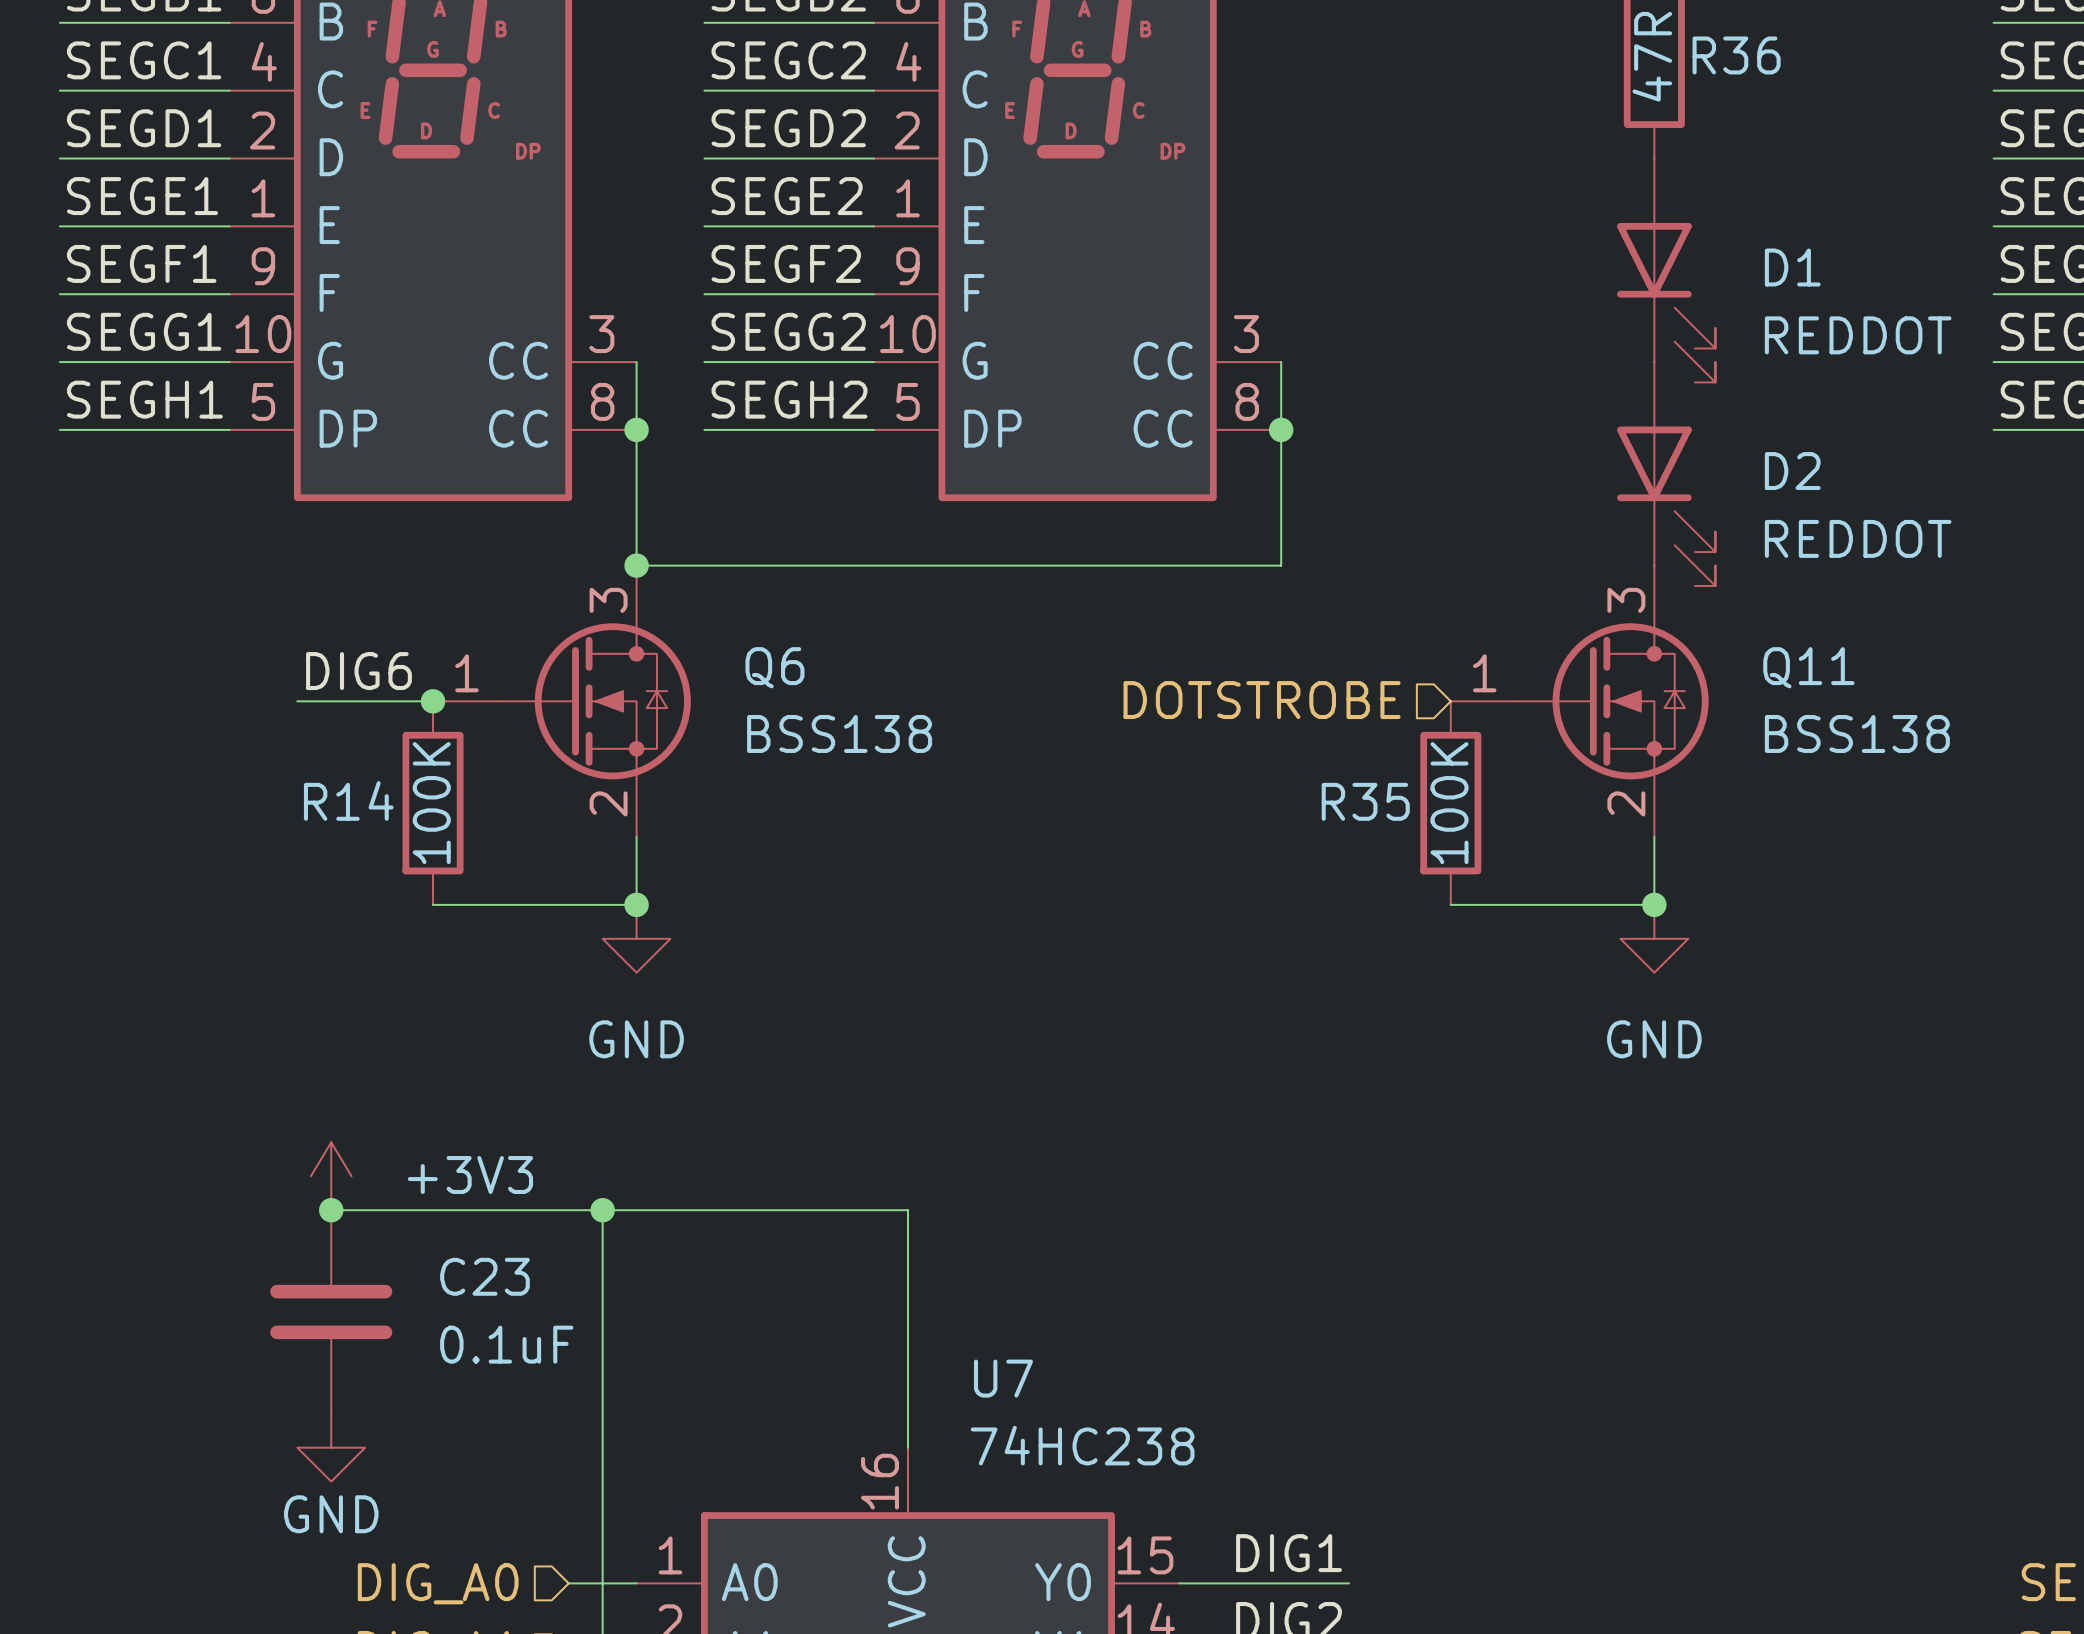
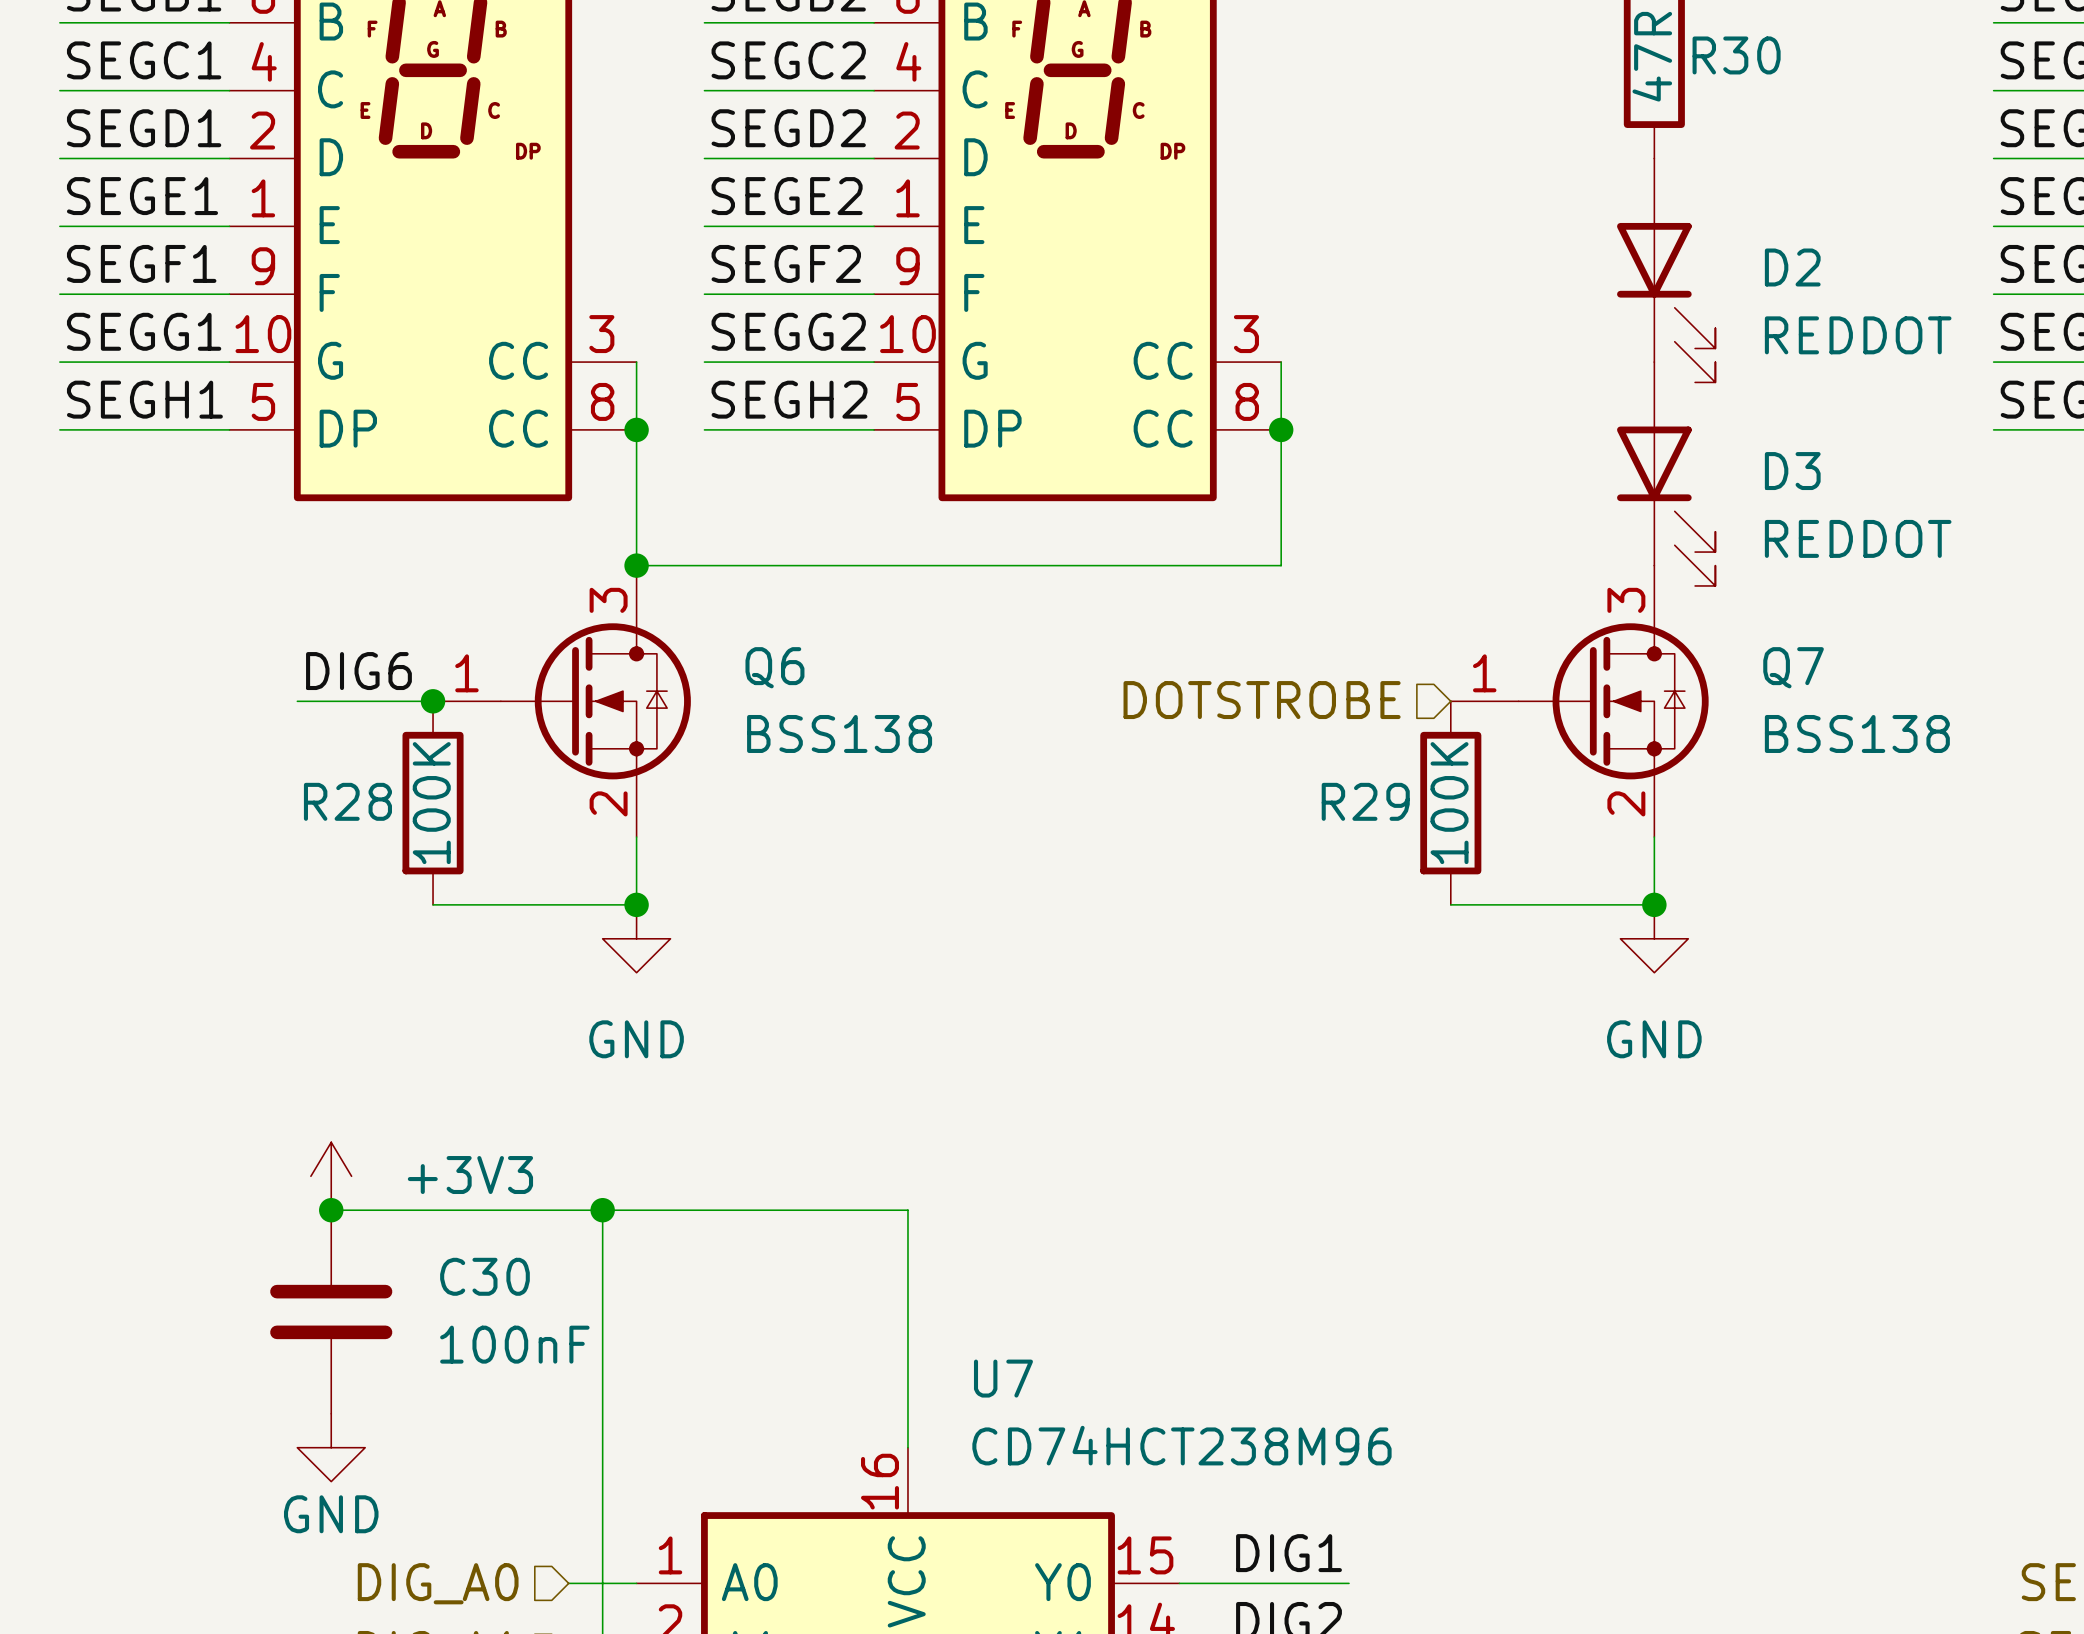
R36 name: R36 (1736, 55) -> R30 (1736, 55)
D1 name: D1 (1792, 267) -> D2 (1792, 267)
D2 name: D2 (1792, 471) -> D3 (1792, 471)
Q11 name: Q11 (1808, 667) -> Q7 (1793, 667)
R14 name: R14 (348, 801) -> R28 (347, 801)
R35 name: R35 (1365, 801) -> R29 (1365, 801)
C23 name: C23 (484, 1276) -> C30 (484, 1276)
C23 value: 0.1uF (506, 1344) -> 100nF (514, 1344)
U7 value: 74HC238 (1082, 1445) -> CD74HCT238M96 (1181, 1445)

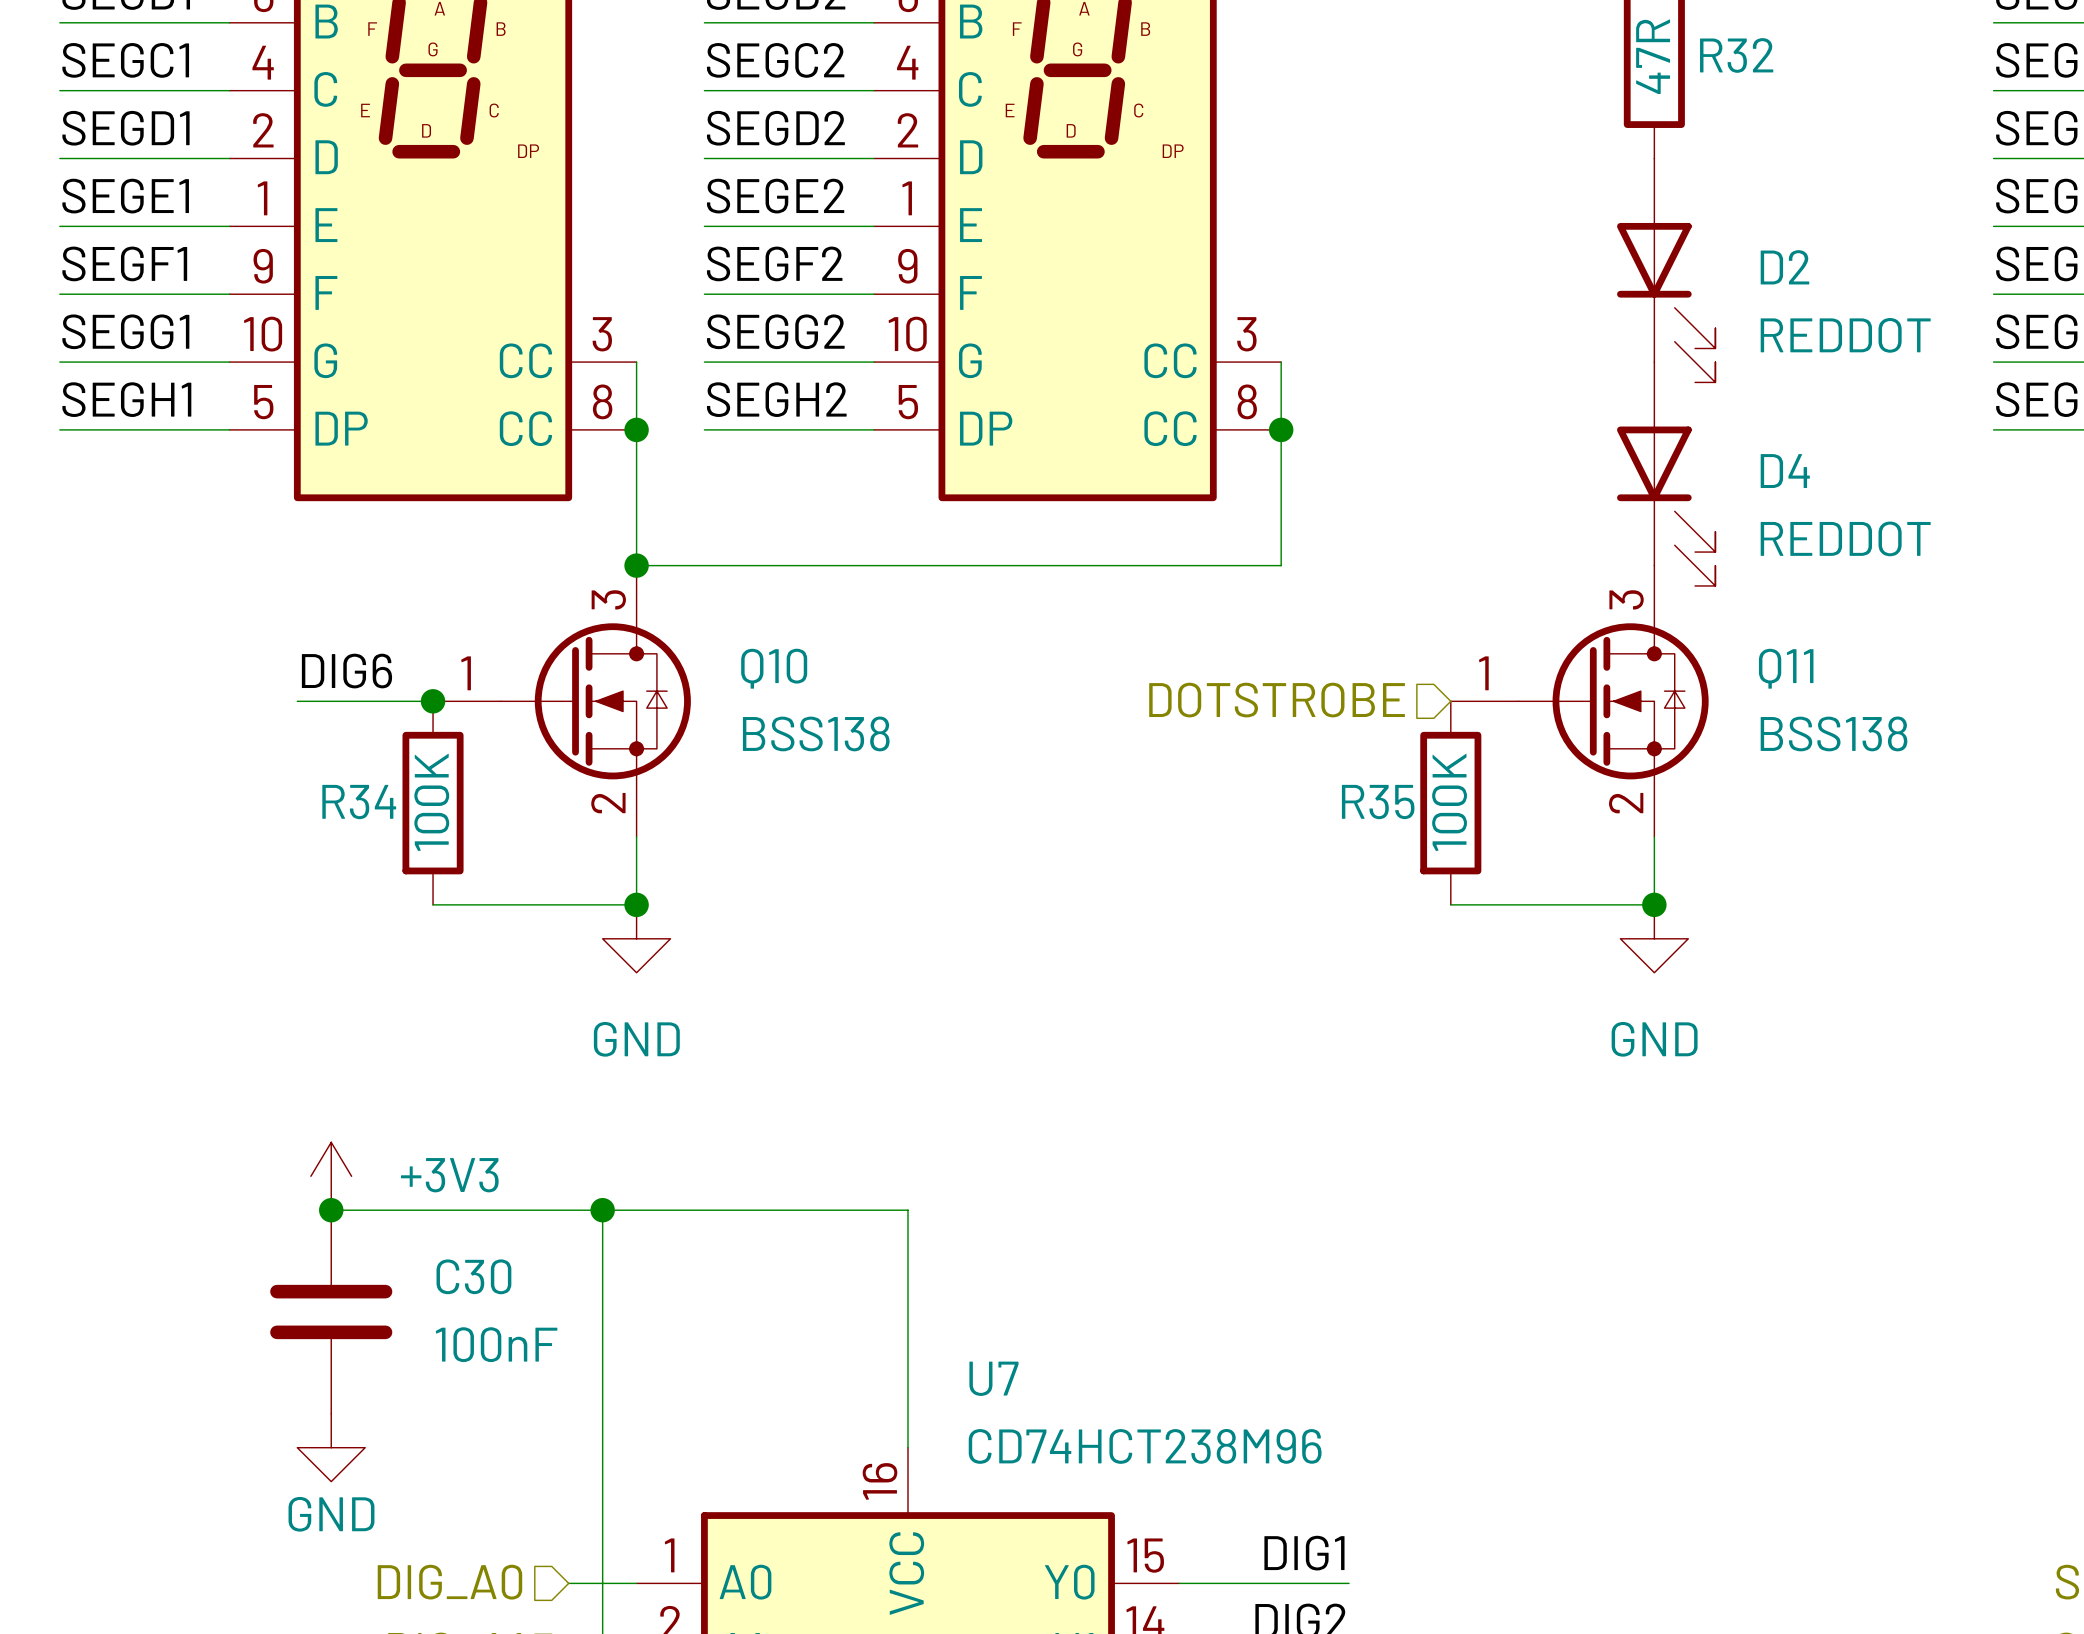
R30 name: R30 (1736, 55) -> R32 (1736, 55)
D3 name: D3 (1792, 471) -> D4 (1785, 471)
Q6 name: Q6 (774, 667) -> Q10 (774, 668)
Q7 name: Q7 (1793, 667) -> Q11 (1786, 668)
R28 name: R28 (347, 801) -> R34 (359, 802)
R29 name: R29 (1365, 801) -> R35 (1378, 802)

